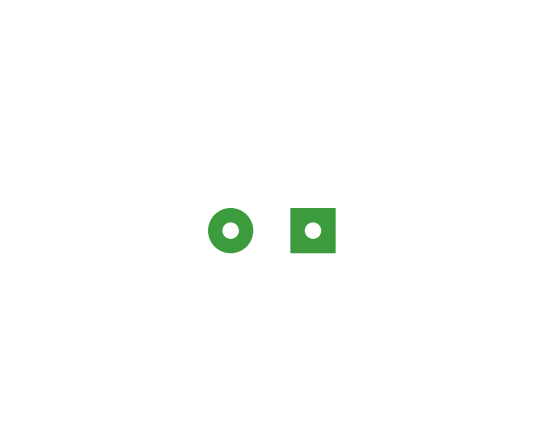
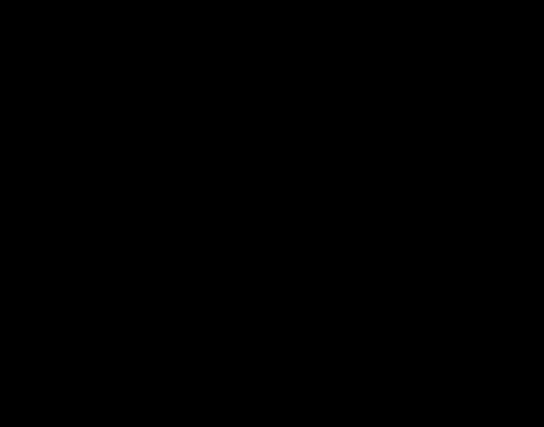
part: (271, 230) -> none

